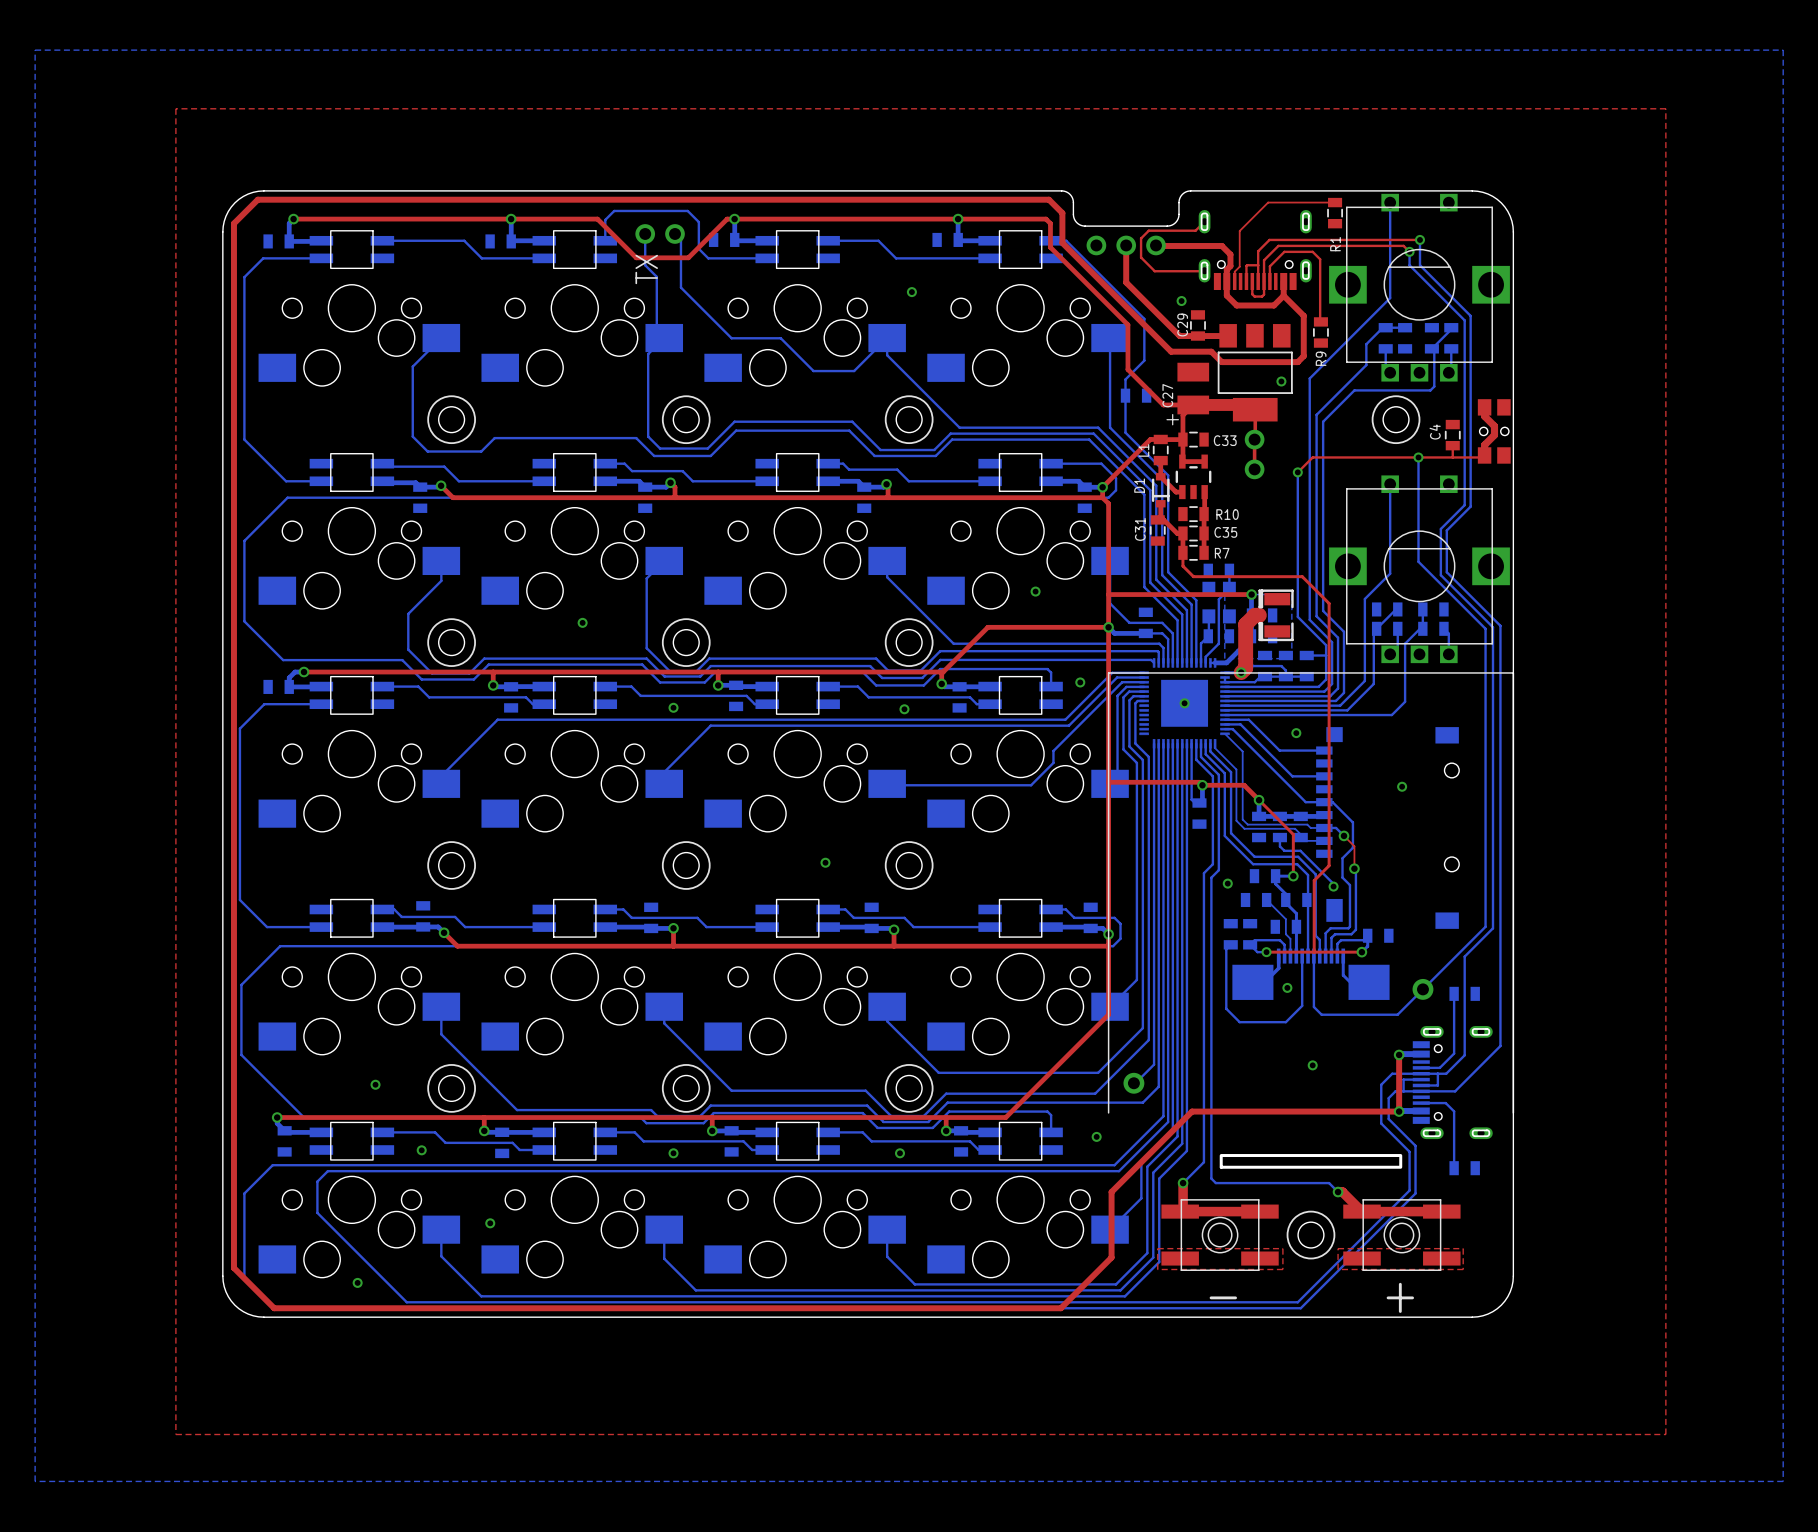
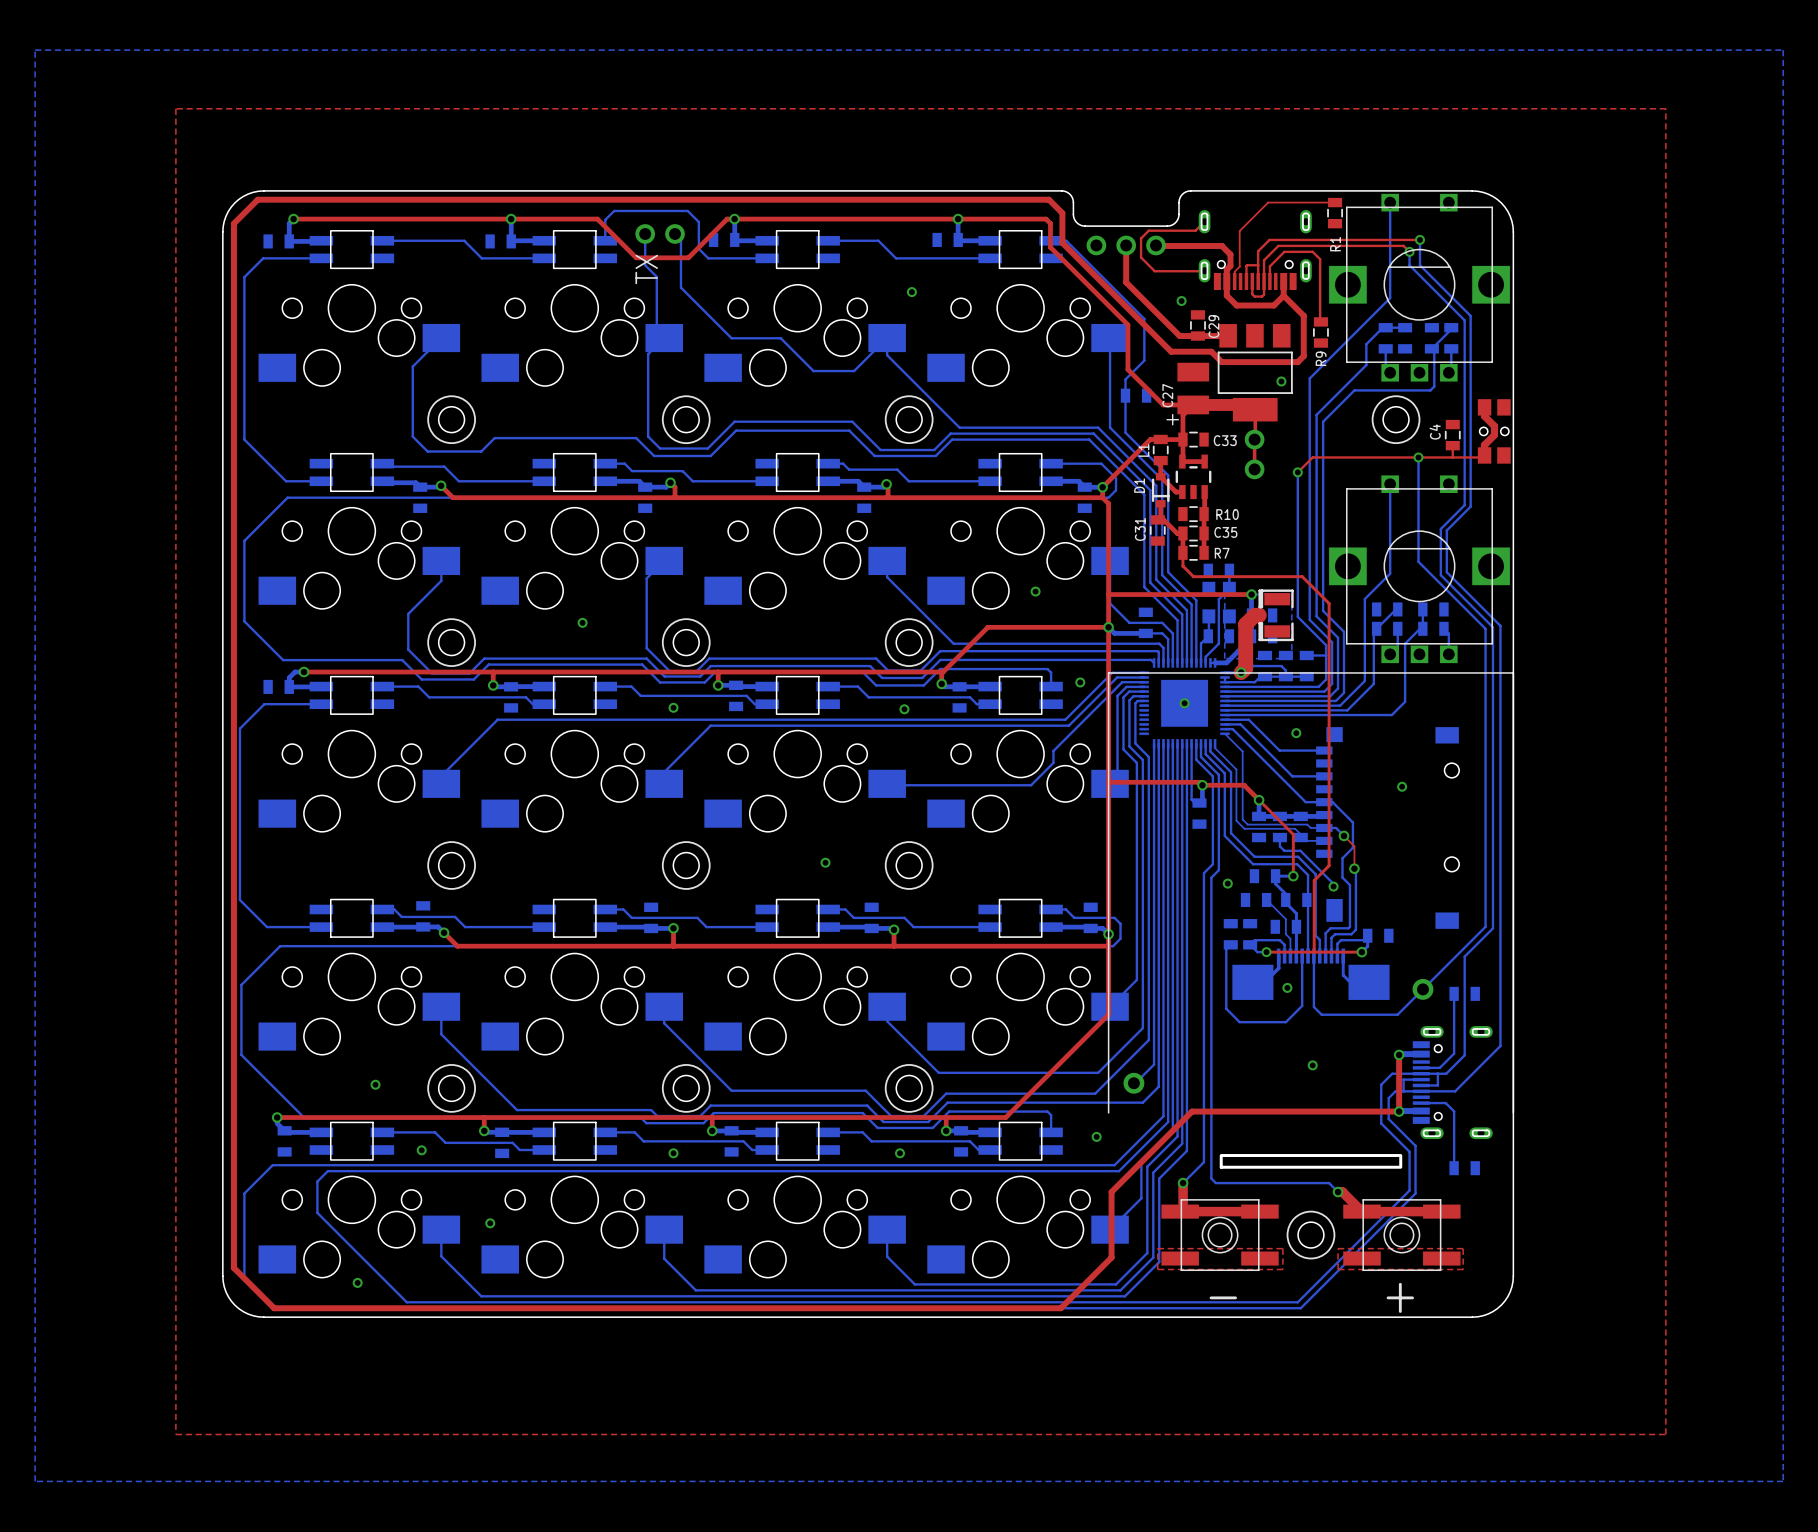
C29 name position: C29 (1182, 325) -> C29 (1213, 326)

